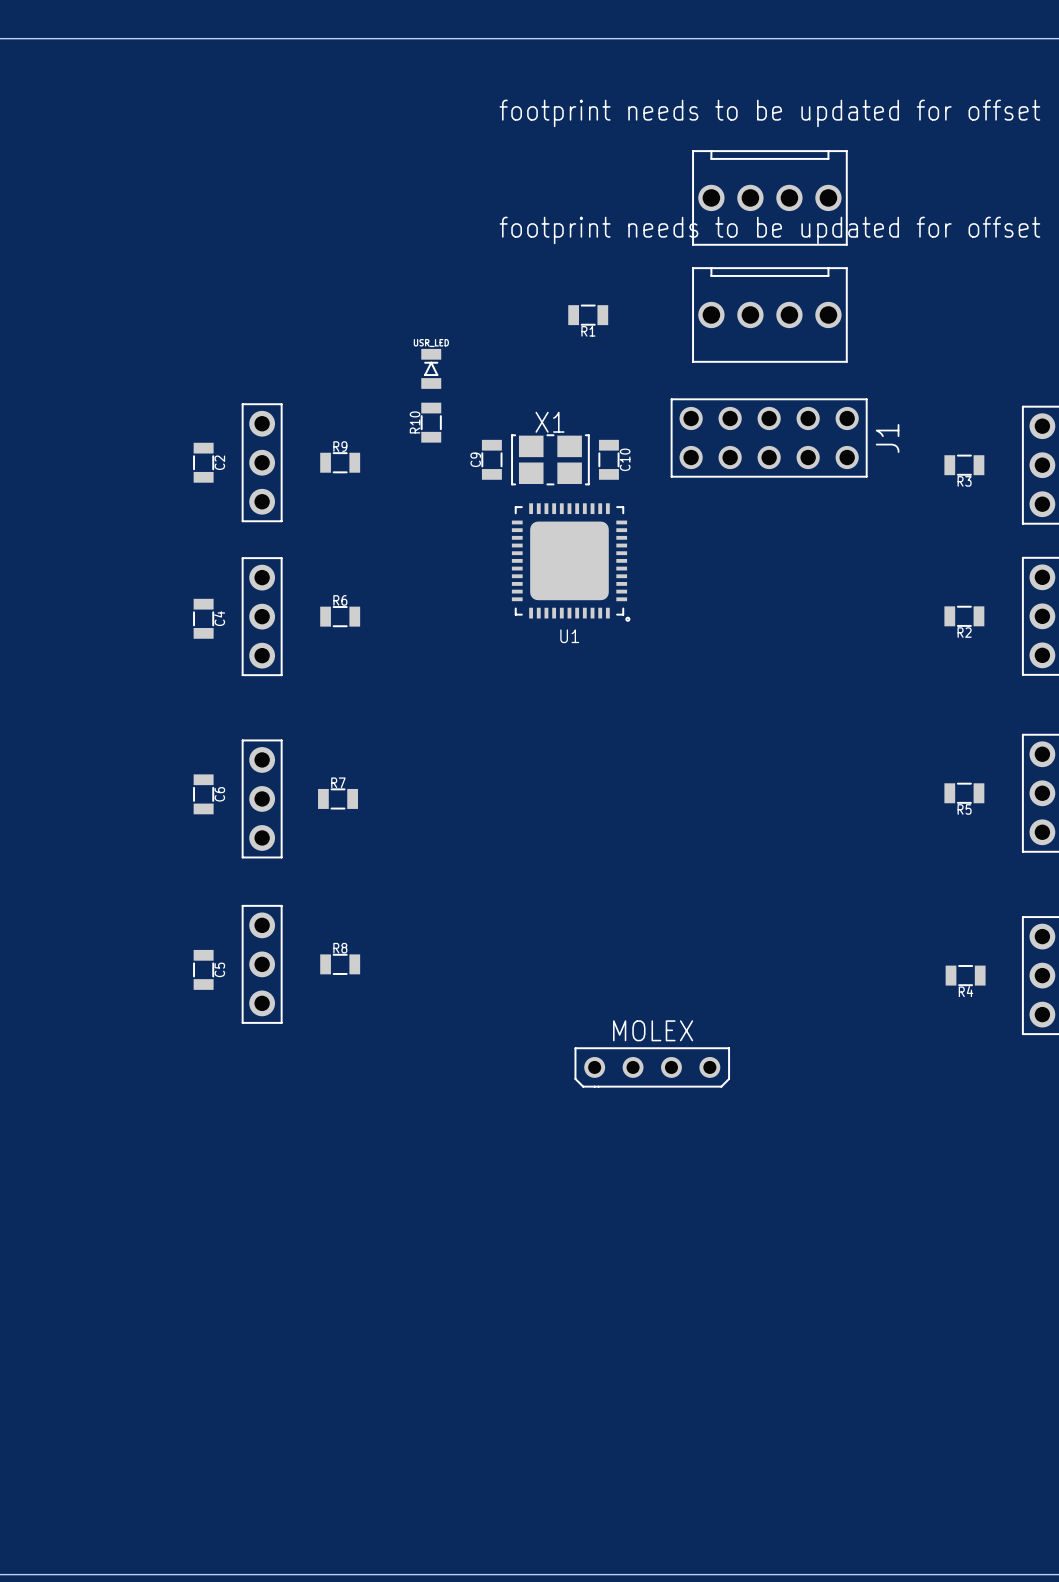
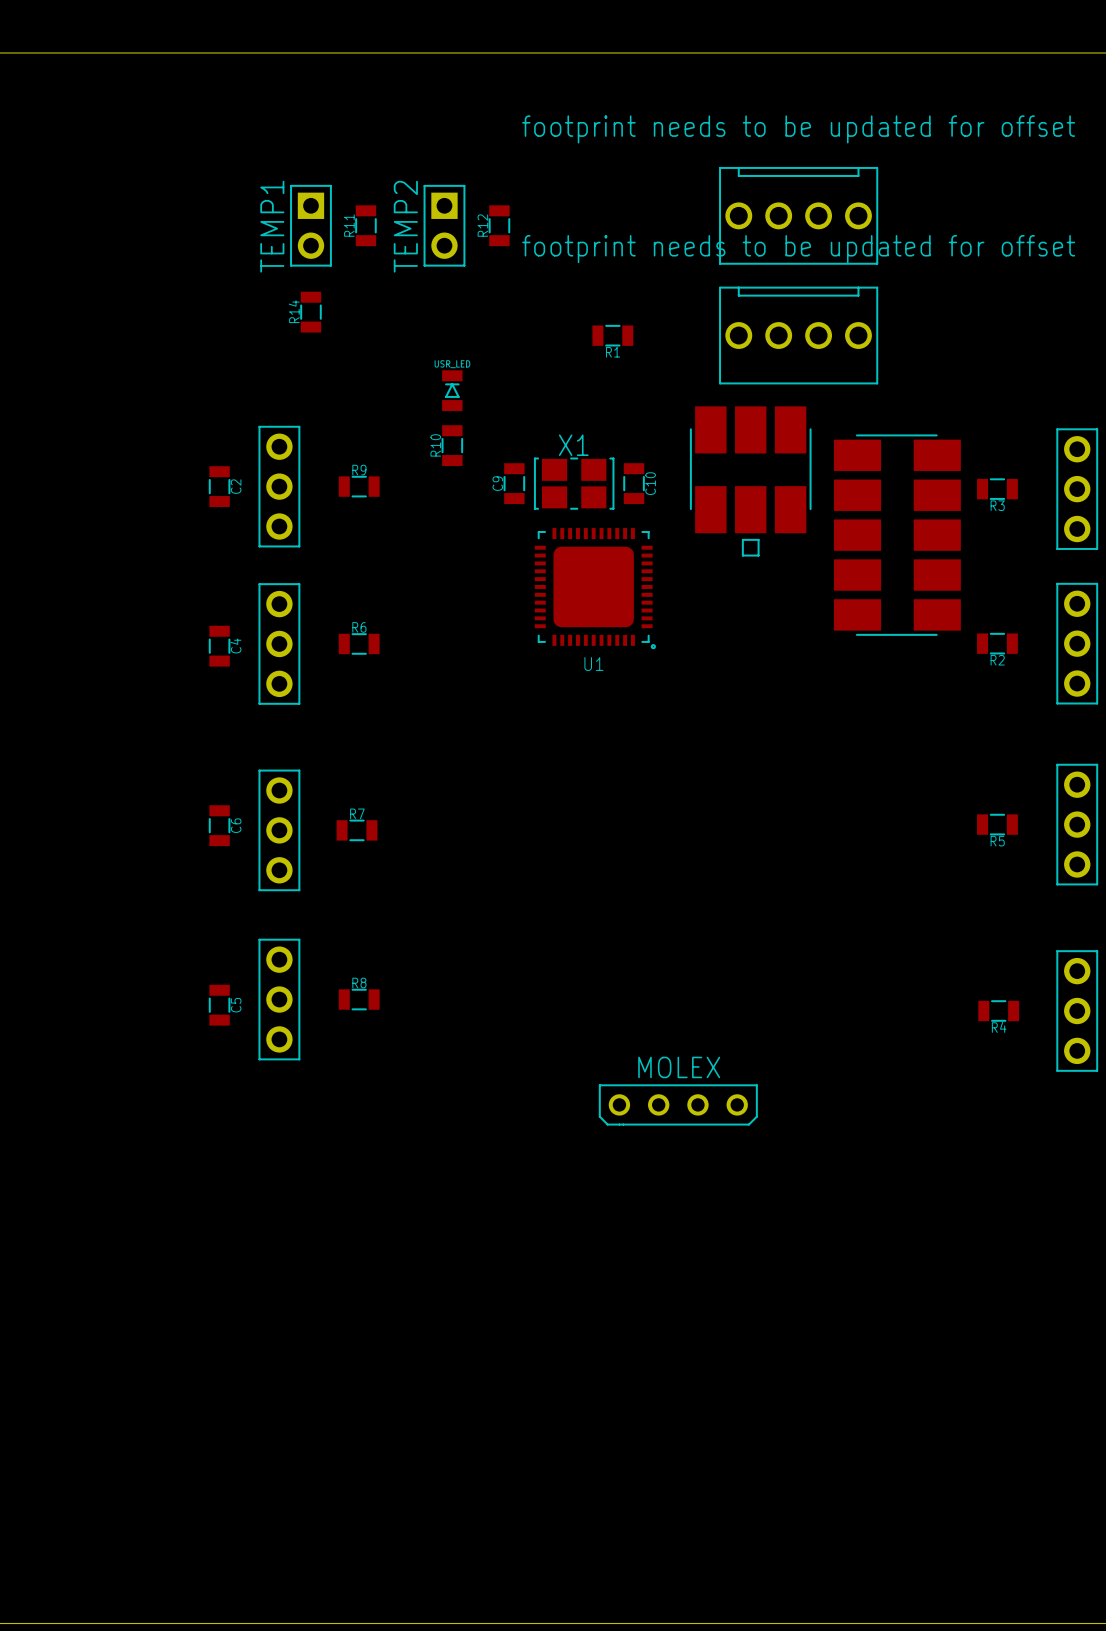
TEMP1: none -> (310, 225)
R11: none -> (365, 225)
TEMP2: none -> (444, 225)
R12: none -> (499, 225)
R14: none -> (310, 312)
J1: (769, 438) -> none
part: none -> (750, 481)
part: none -> (897, 535)

